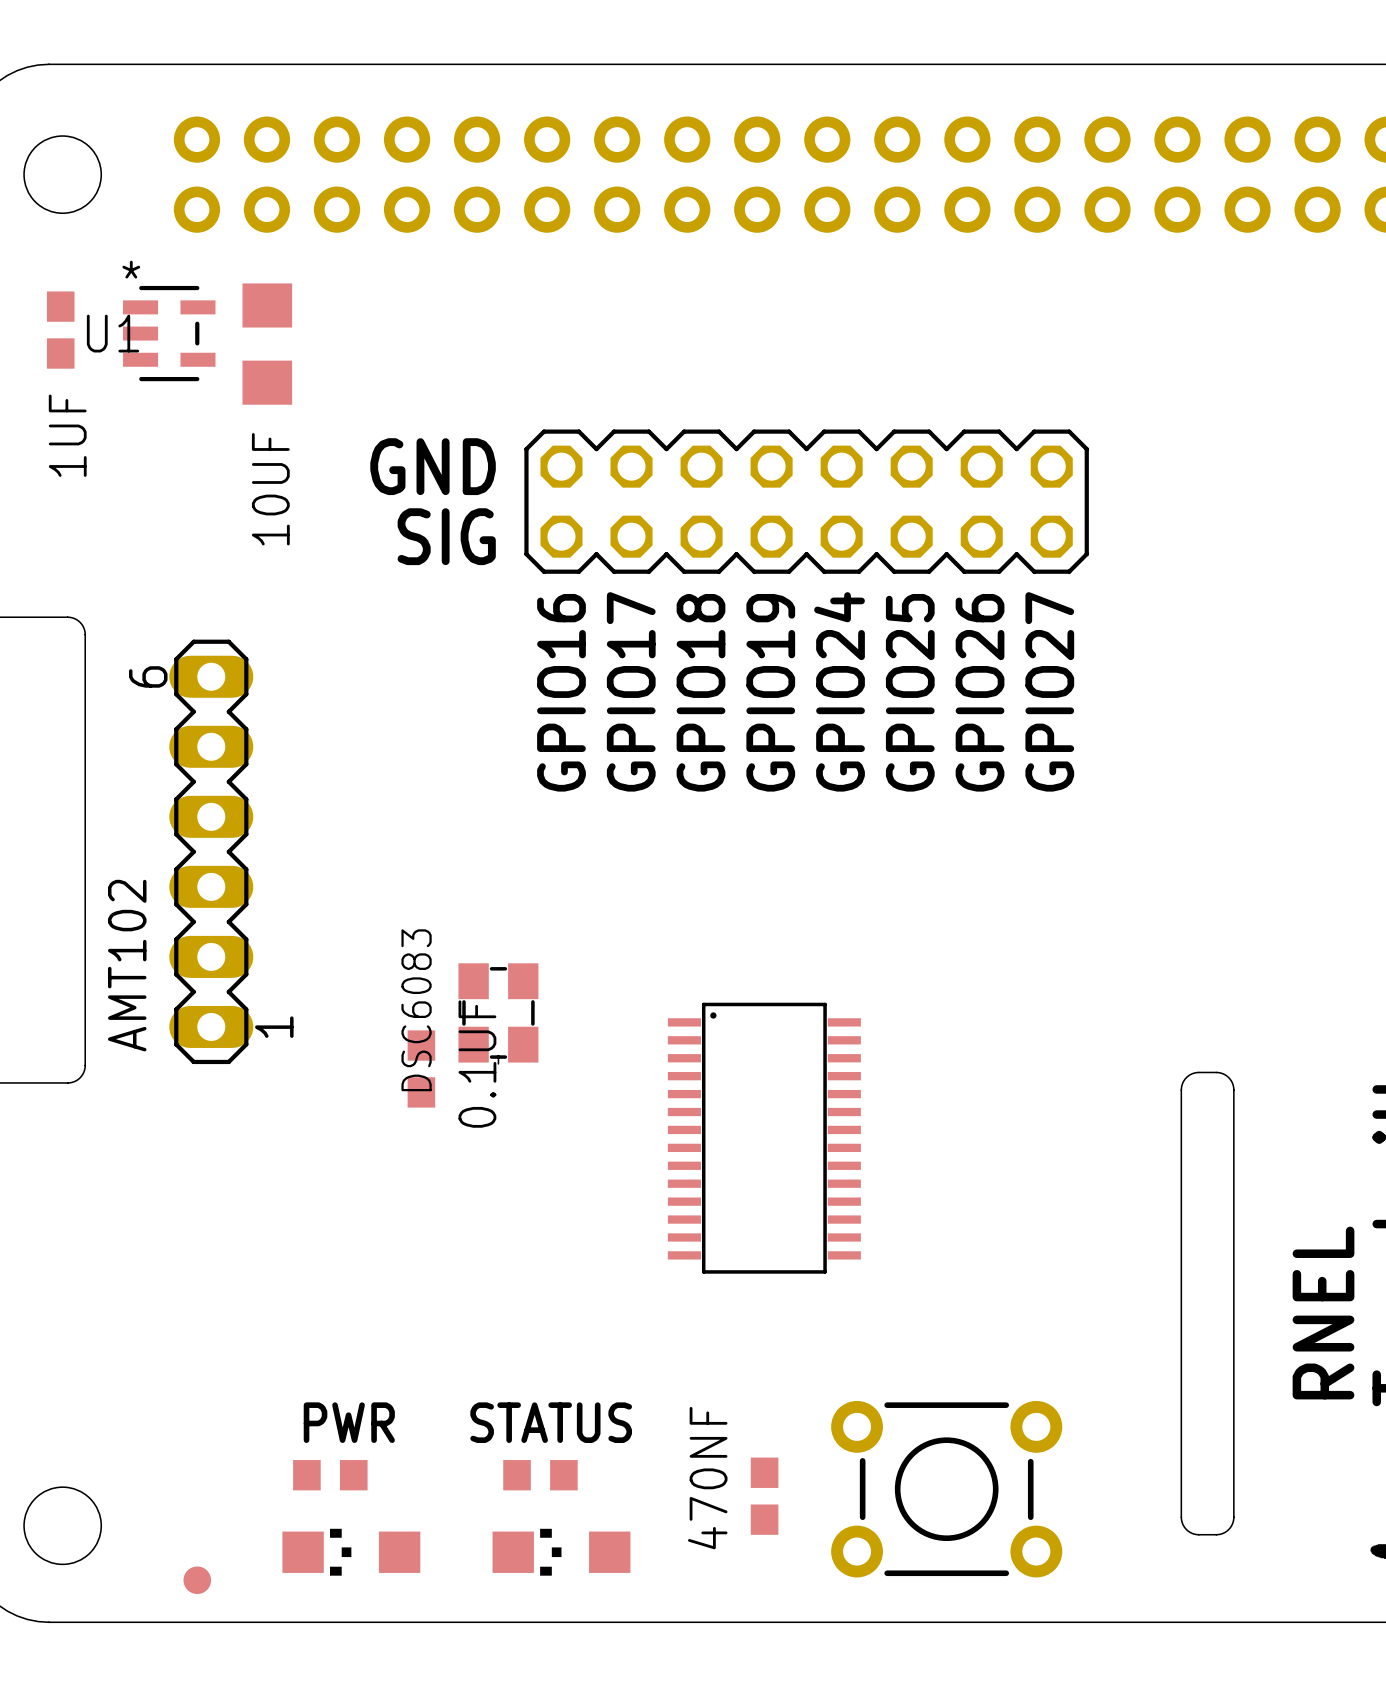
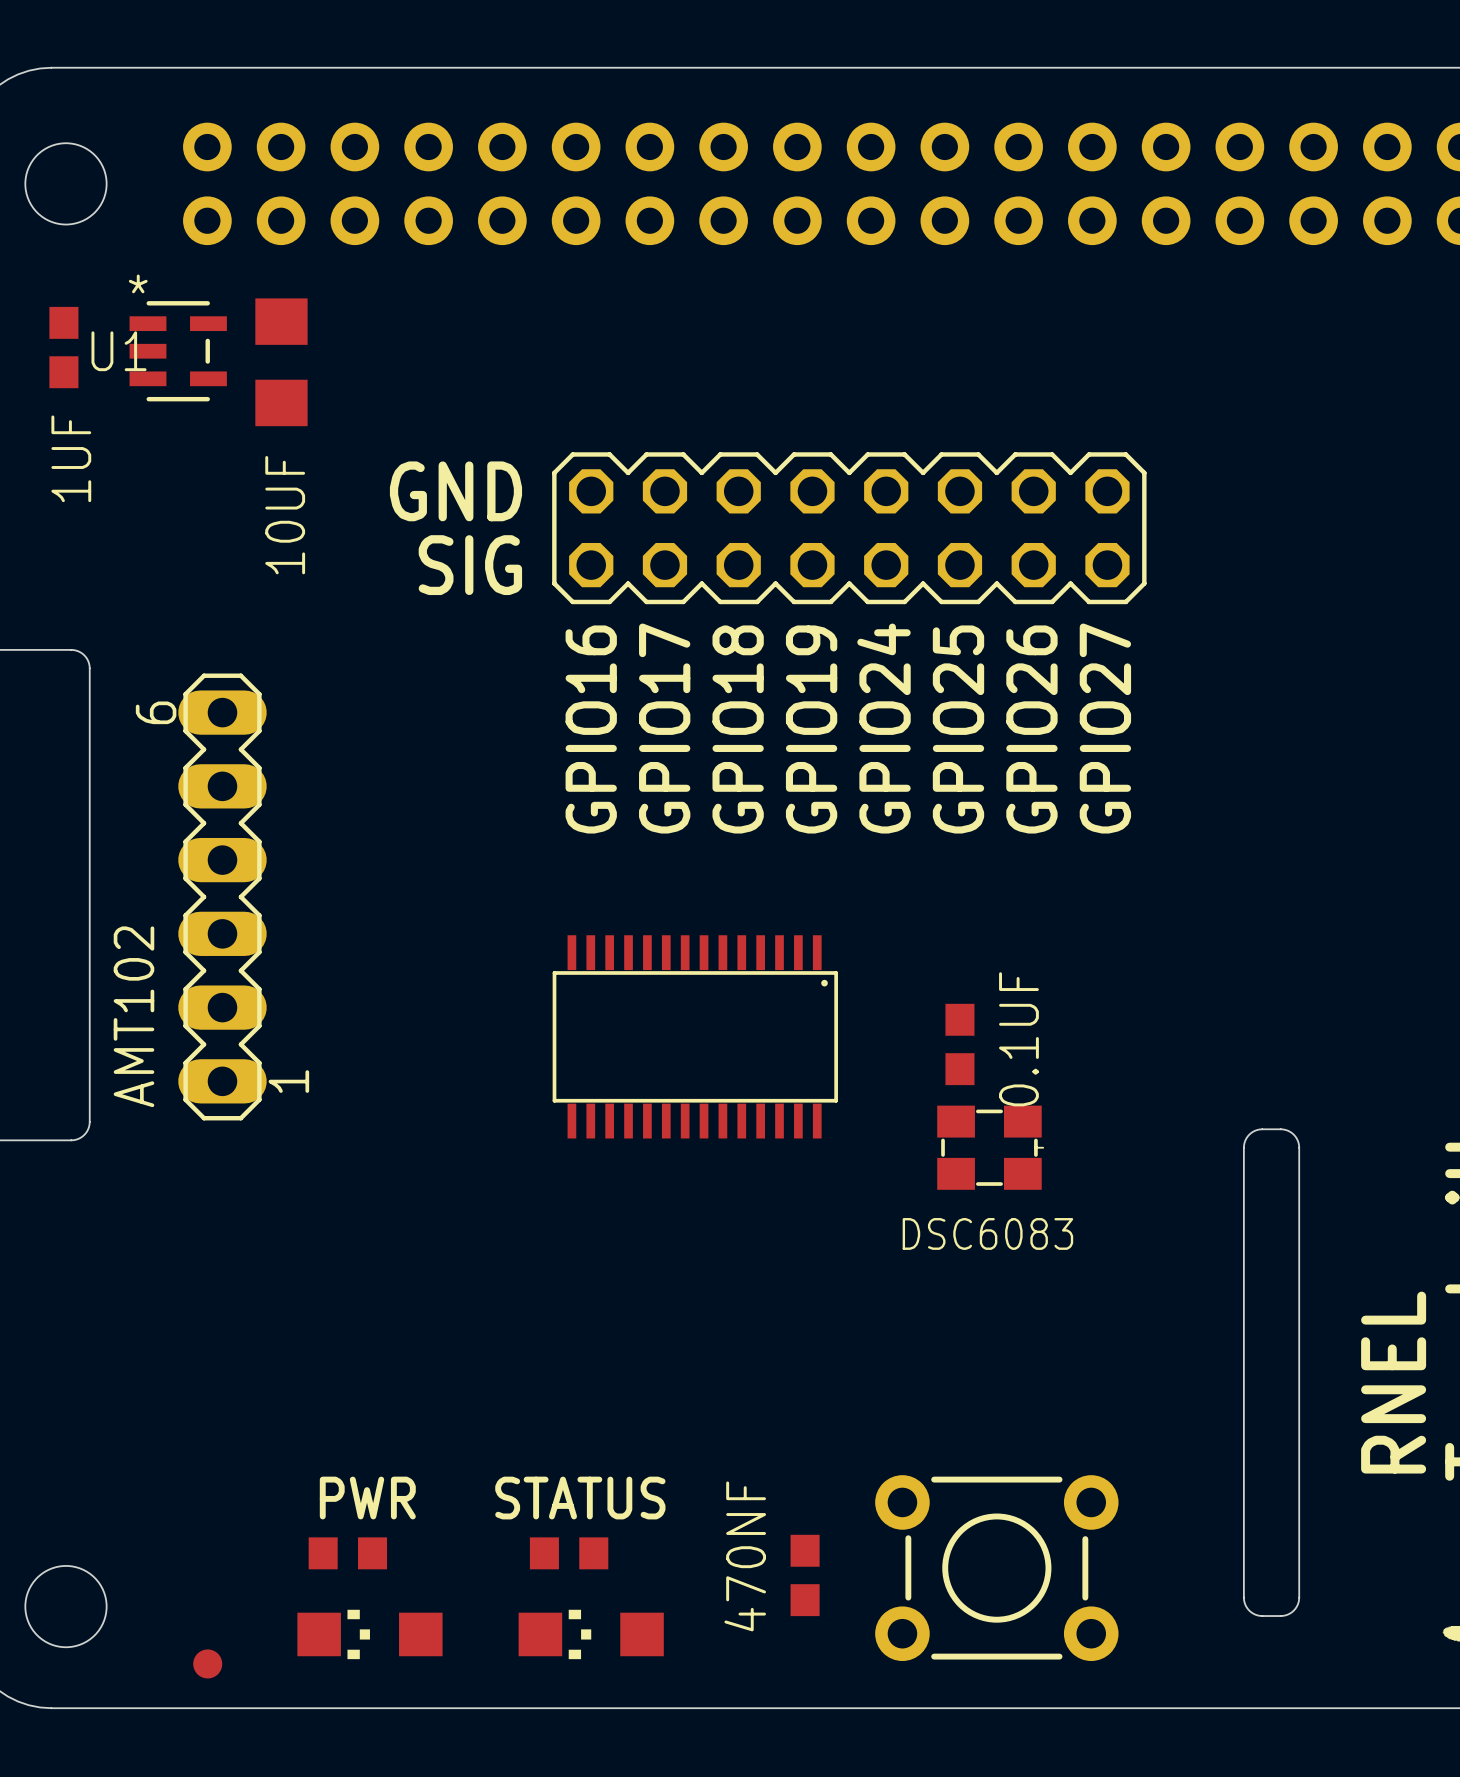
DSC6083 rotation: 0° (498, 1013) -> 90° counterclockwise (990, 1147)
DSC6083 position: (498, 1013) -> (990, 1147)
0.1UF position: (421, 1068) -> (959, 1044)
part rotation: 0° (764, 1138) -> 90° clockwise (695, 1036)
part position: (764, 1138) -> (695, 1036)

